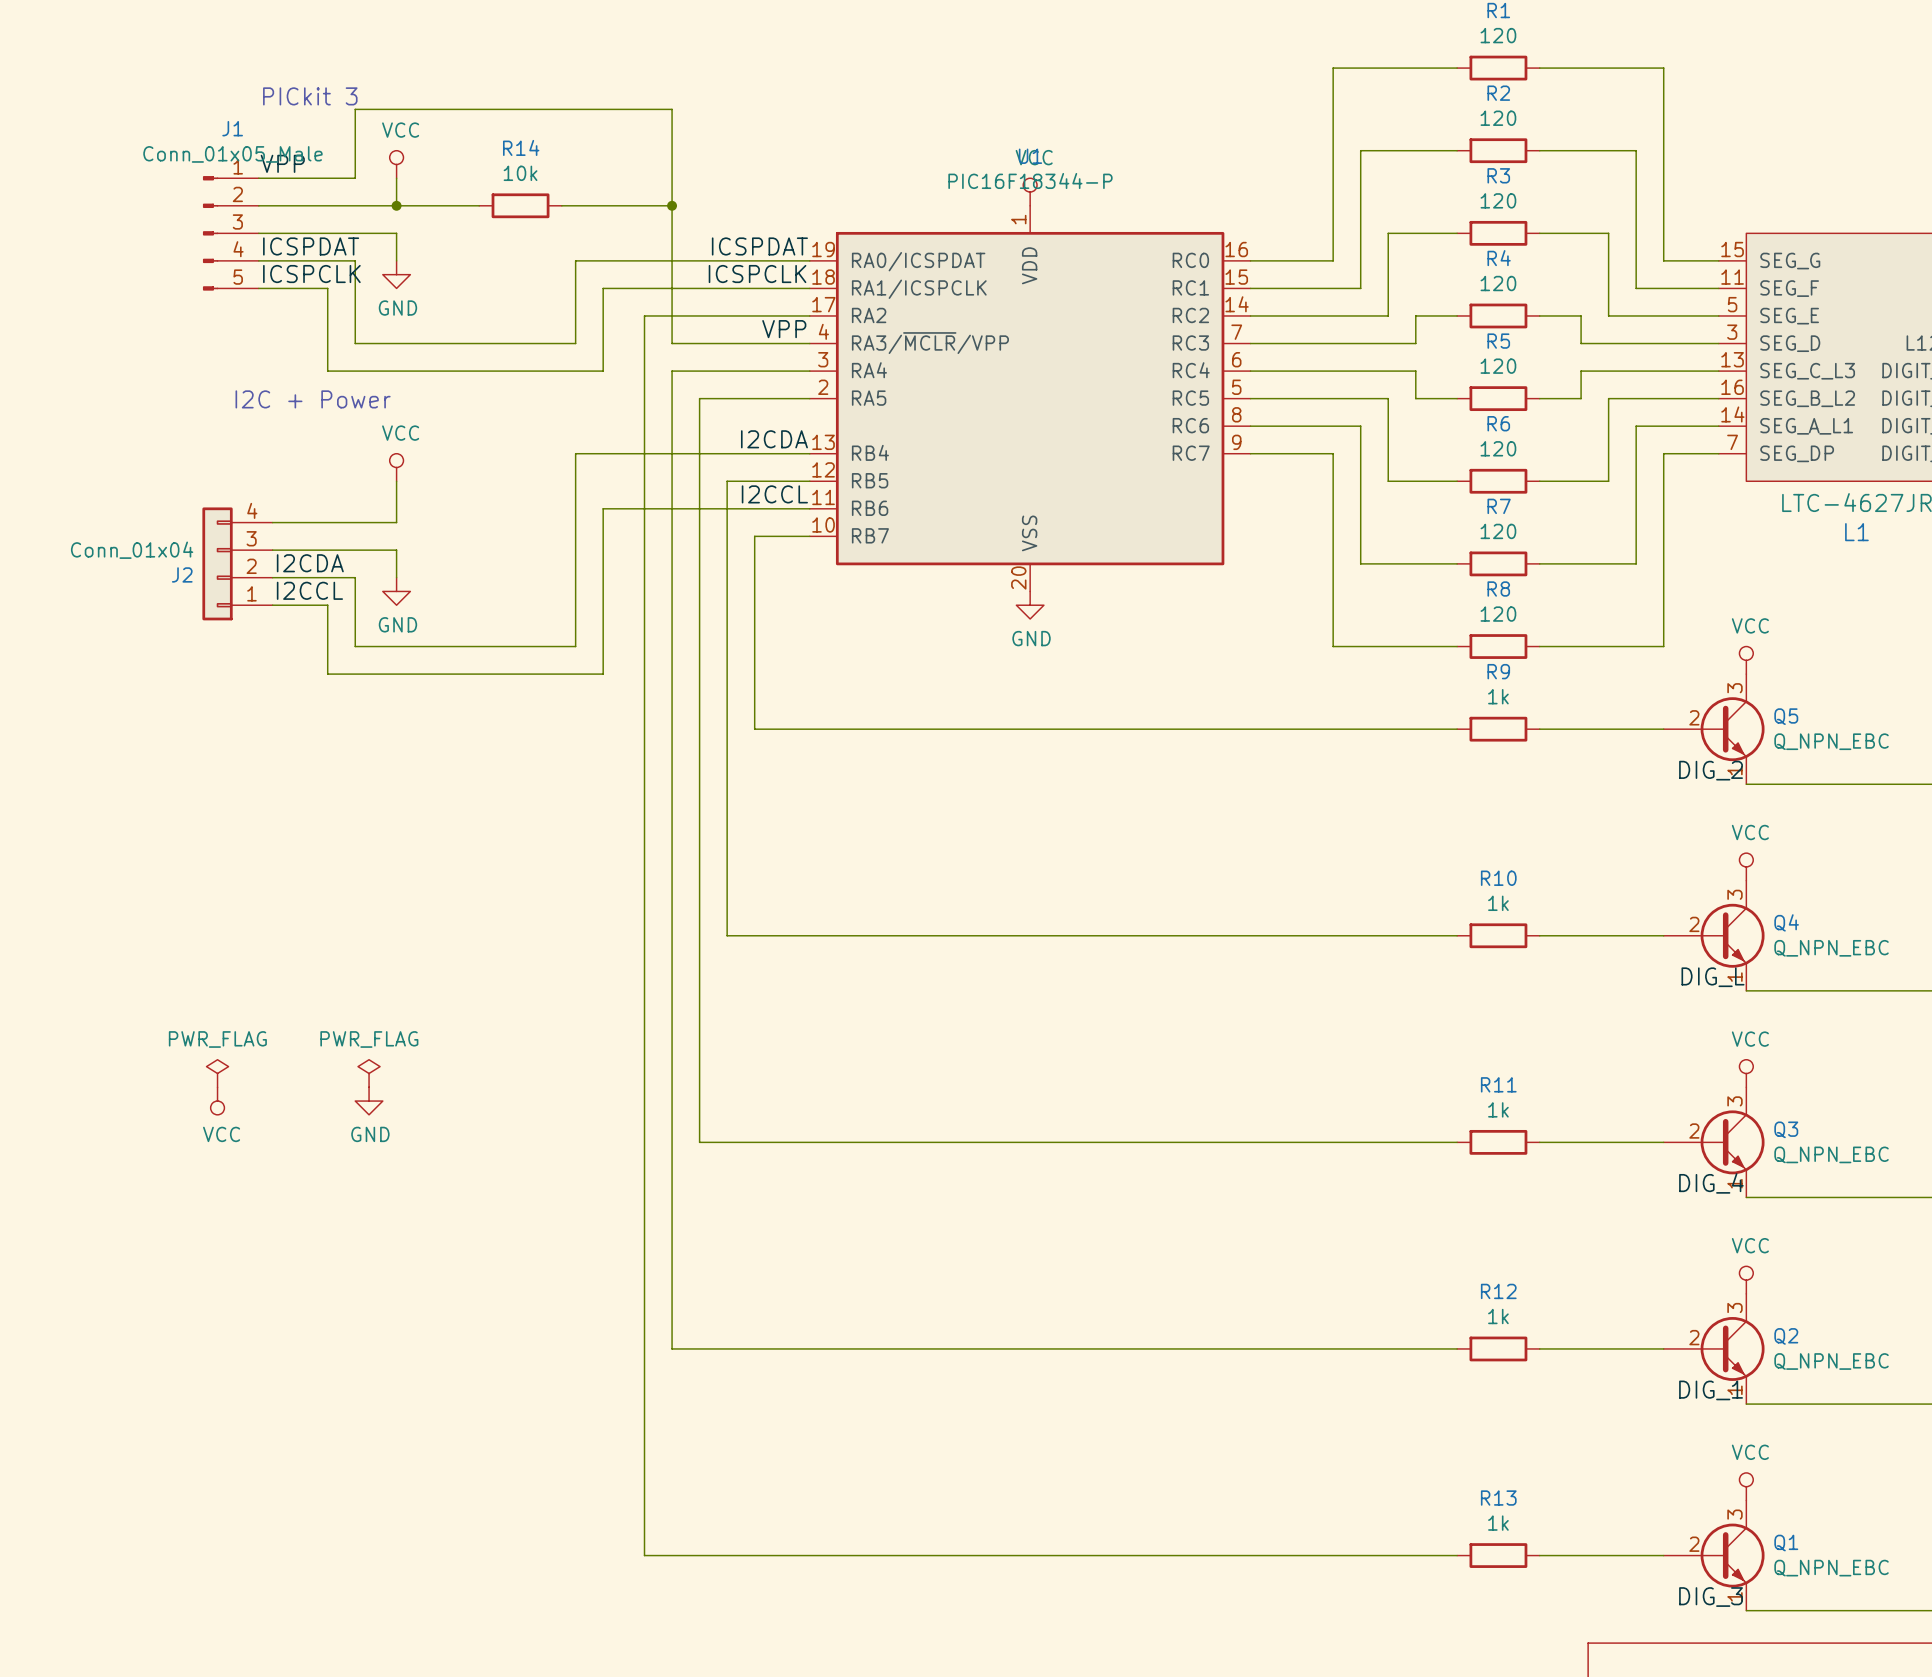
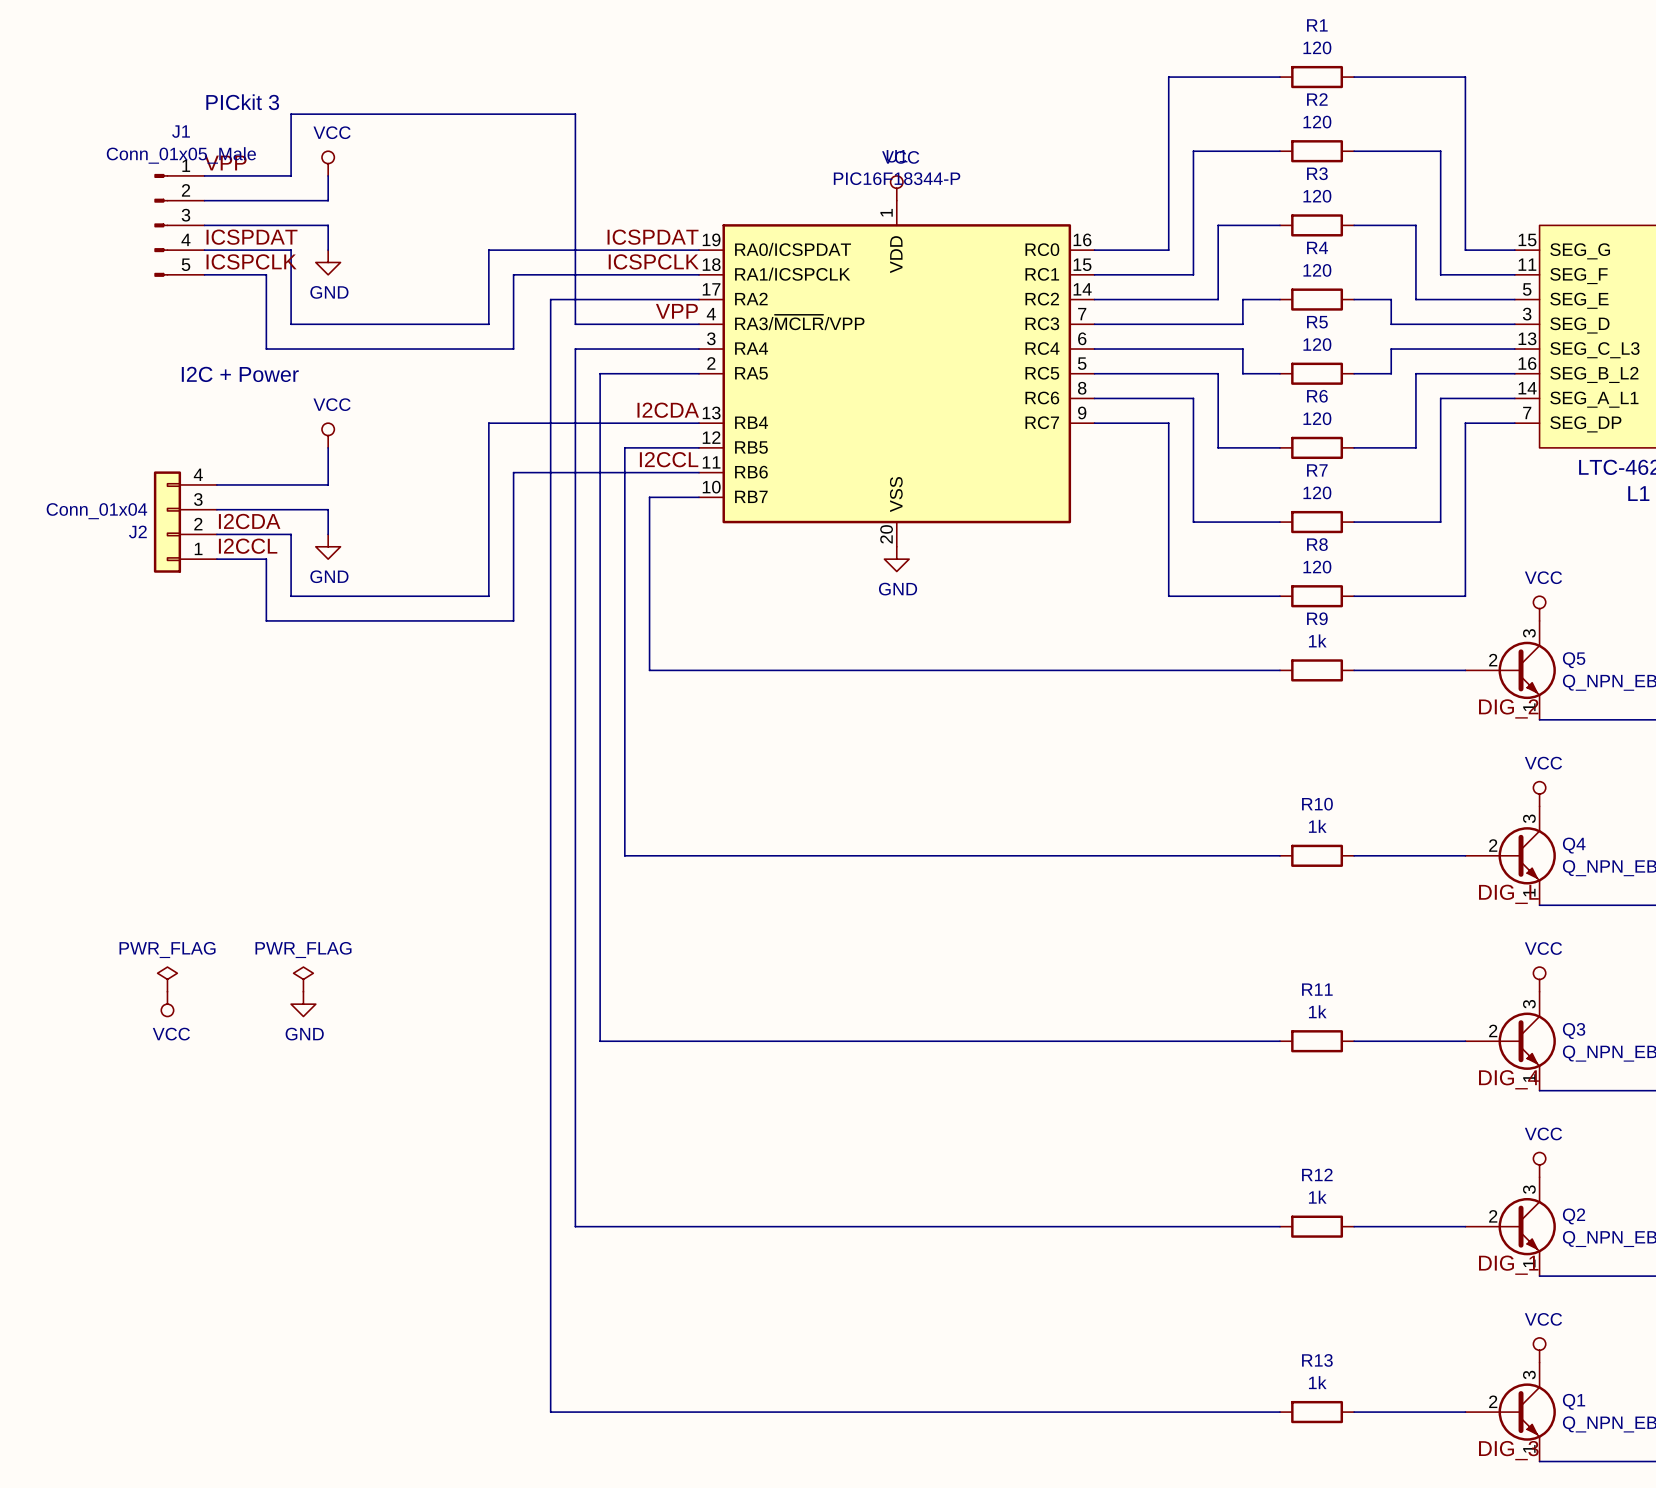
wire: (396, 205) (479, 205) -> none
junction: (396, 205) -> none
R14: 10k (520, 205) -> none
wire: (561, 205) (672, 205) -> none
junction: (672, 205) -> none

